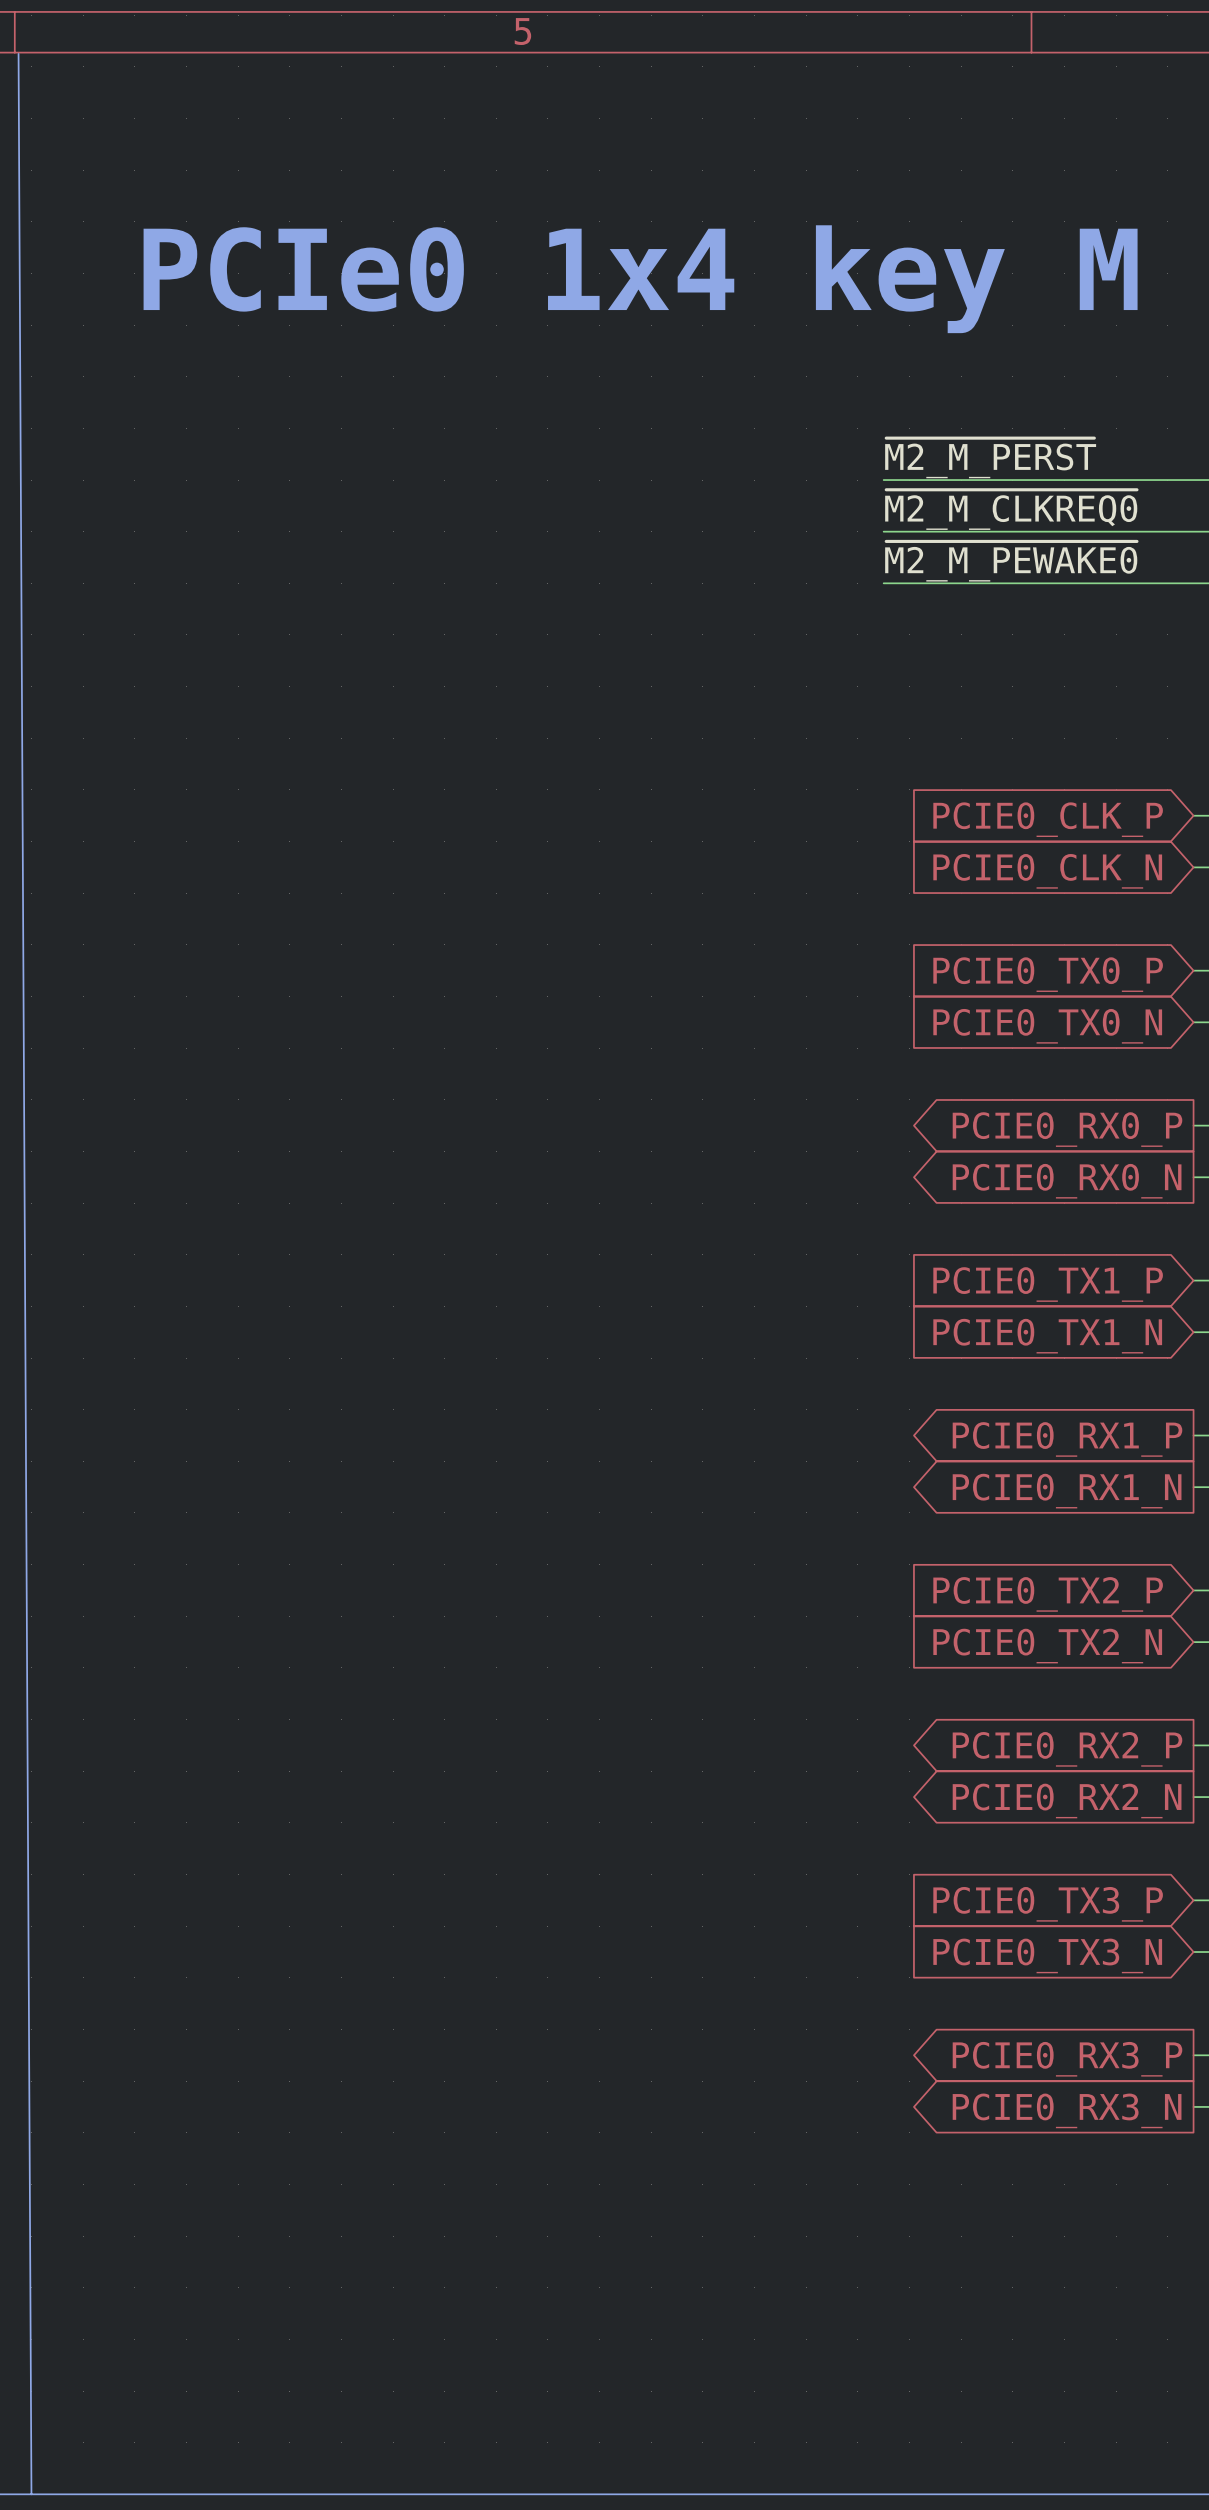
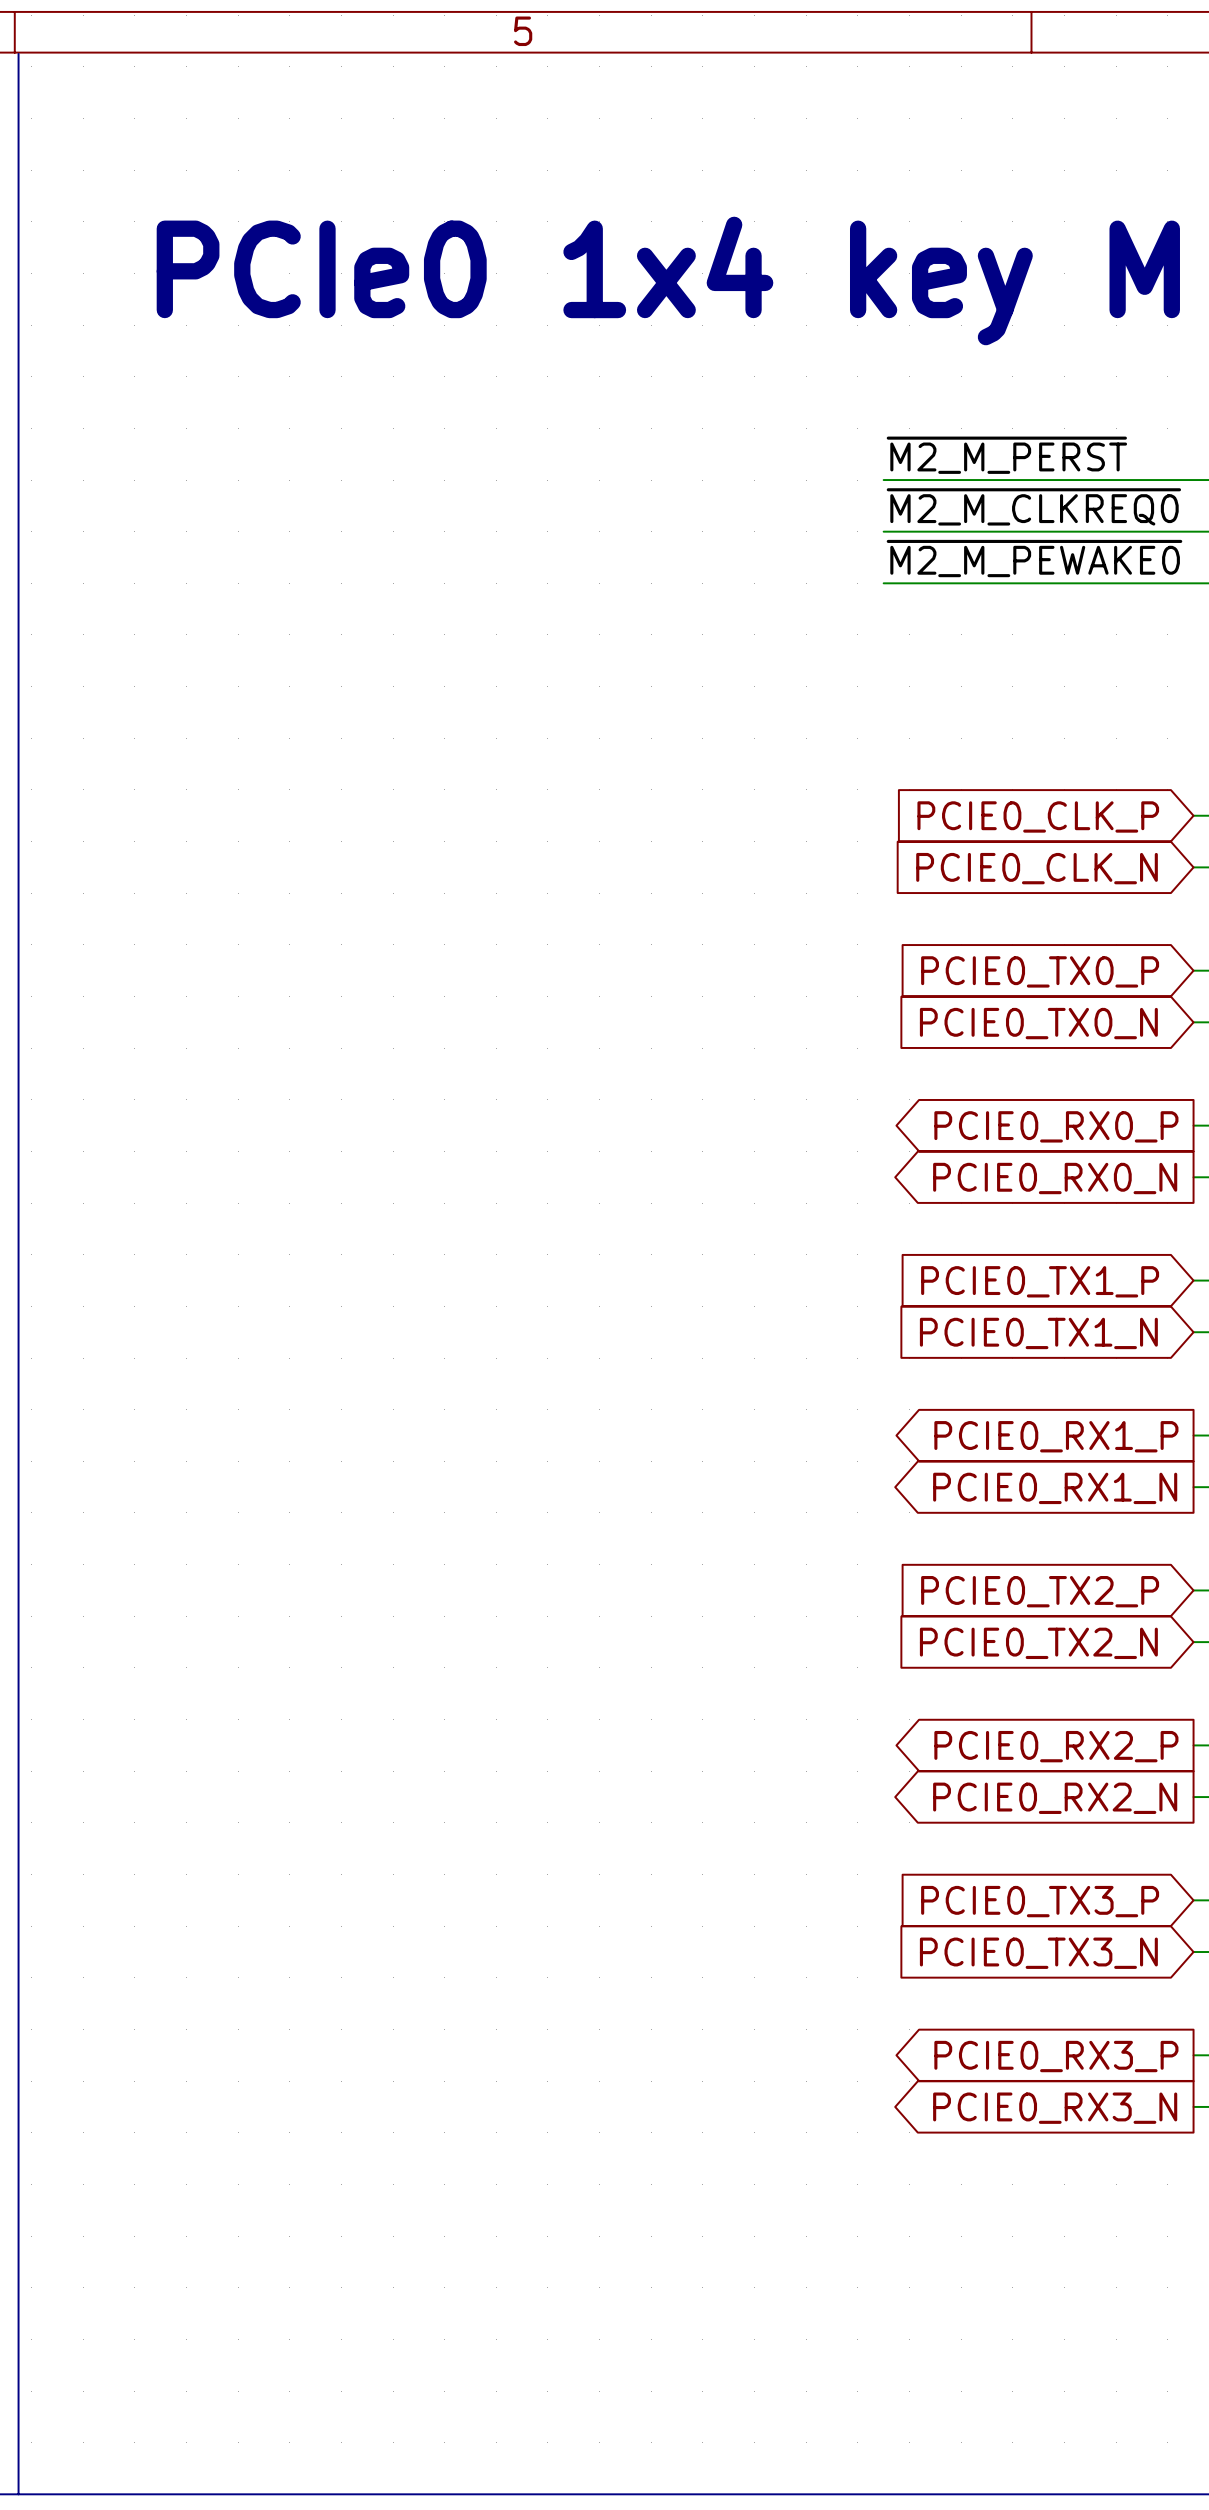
line: (18, 53) (31, 2494) -> (18, 53) (18, 2494)

